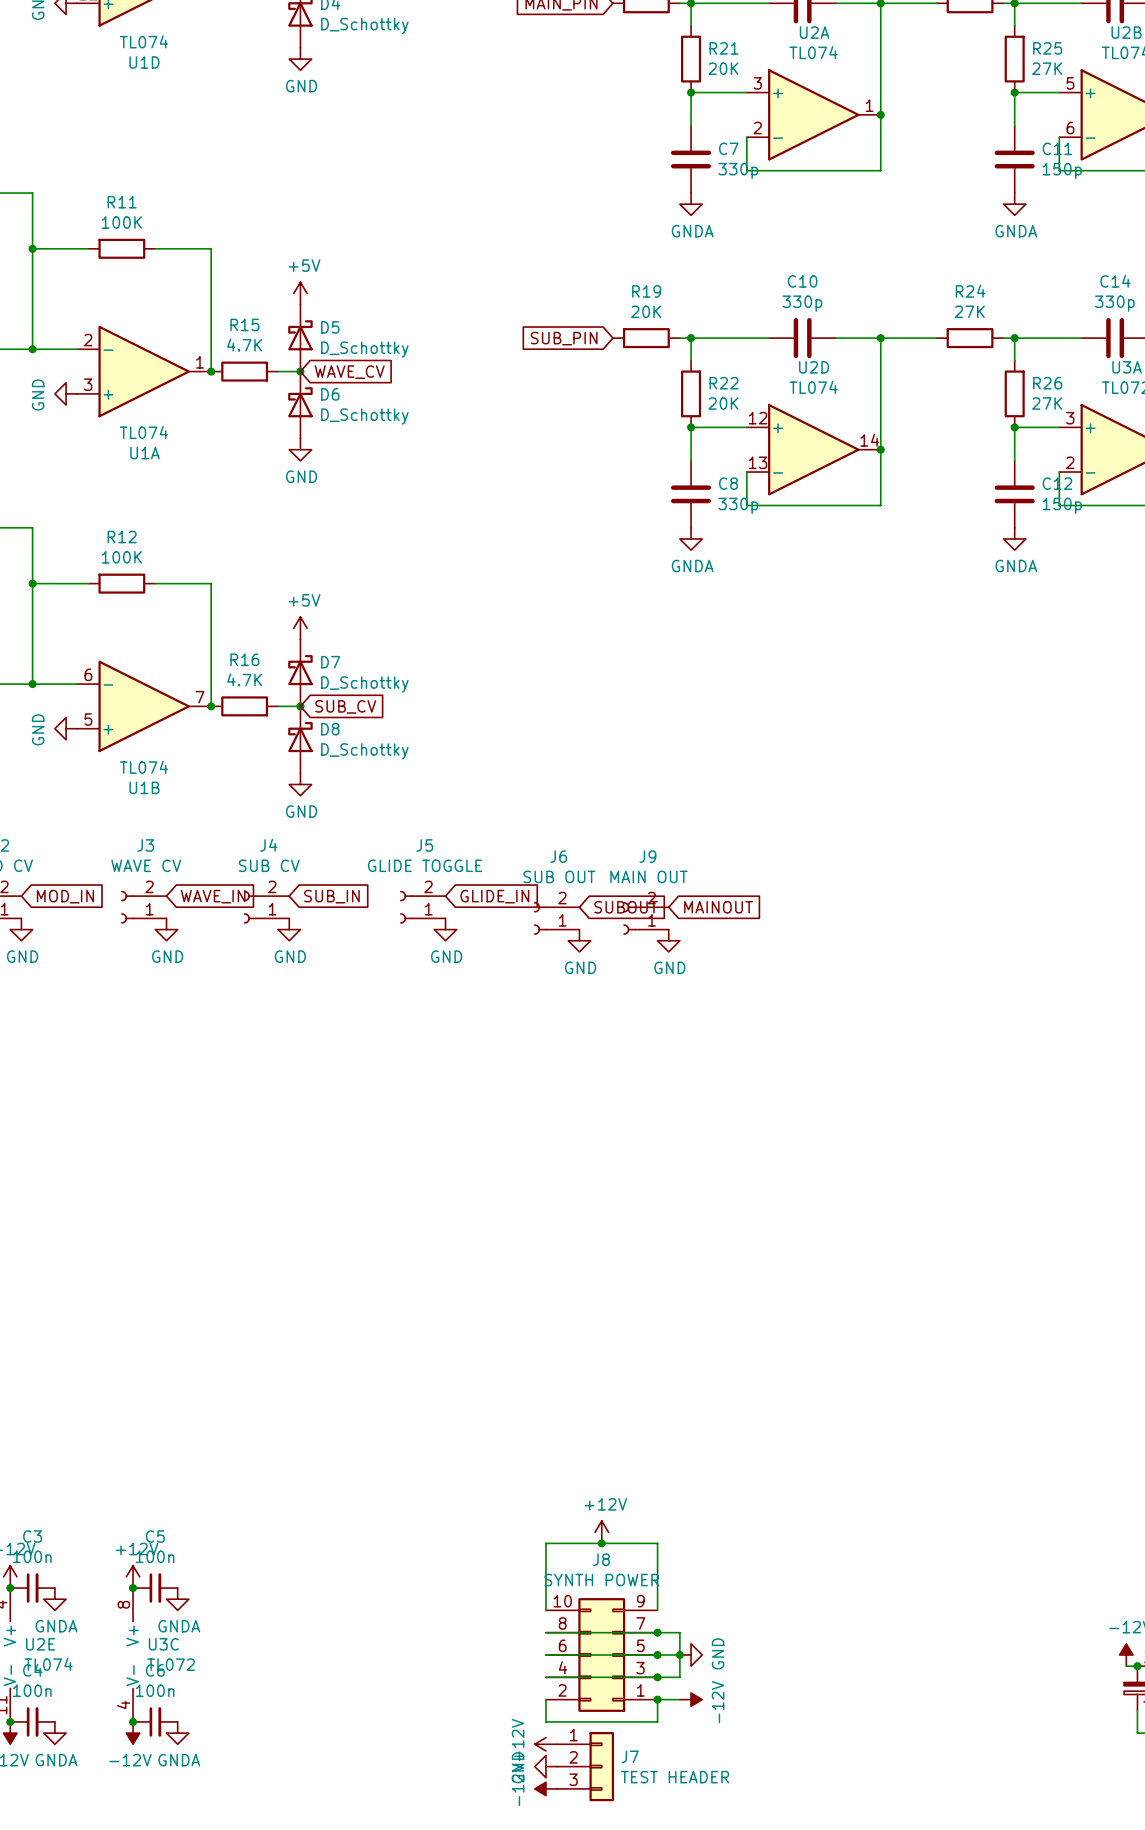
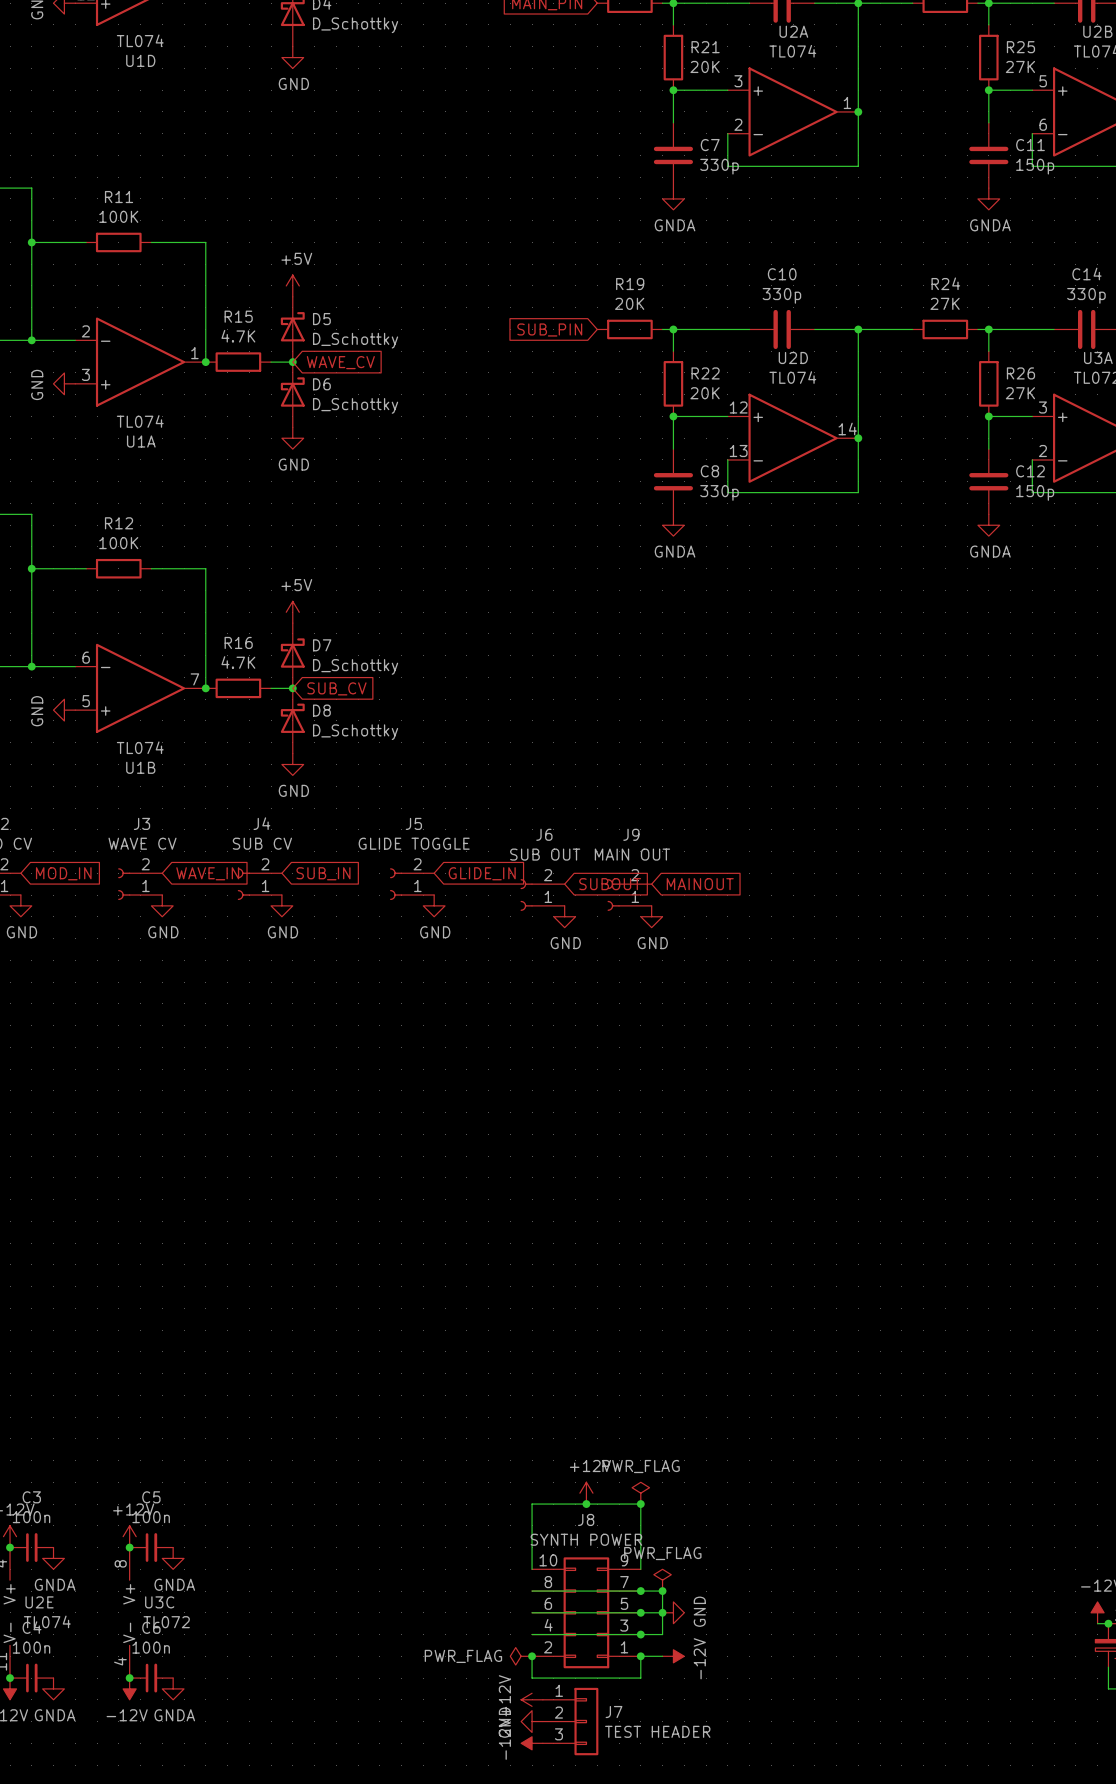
power symbol: none -> PWR_FLAG (640, 1493)
junction: none -> (640, 1504)
power symbol: none -> PWR_FLAG (662, 1580)
junction: none -> (662, 1591)
power symbol: none -> PWR_FLAG (521, 1656)
junction: none -> (532, 1656)

